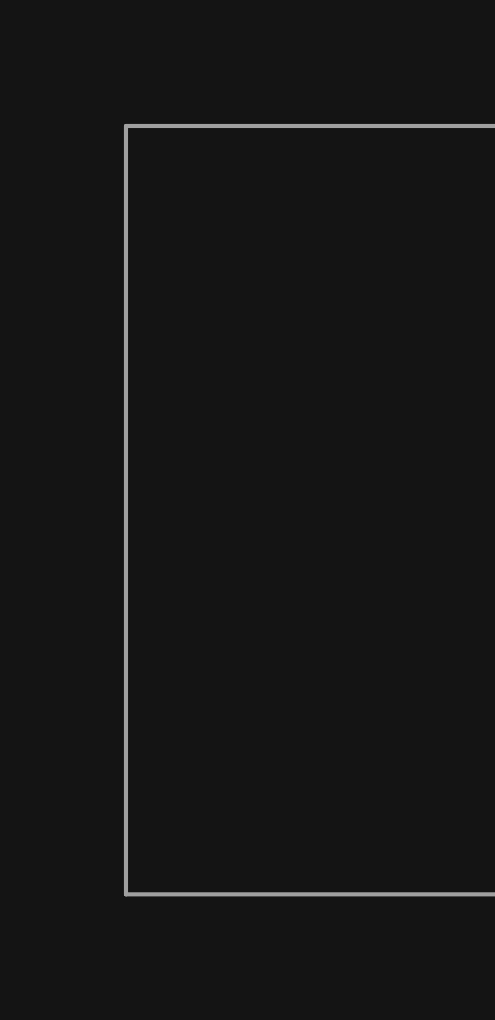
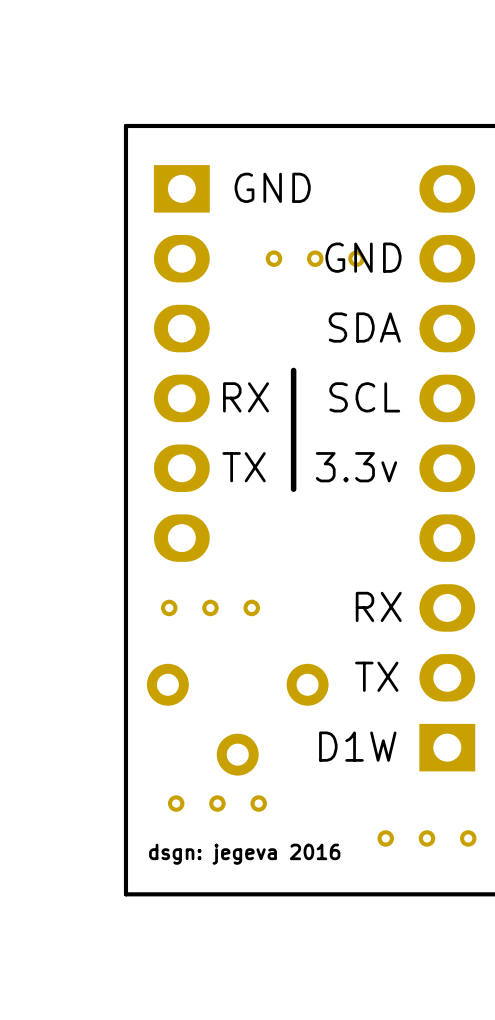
text: none -> GND (272, 187)
text: none -> GND (363, 257)
part: none -> (273, 258)
part: none -> (315, 258)
part: none -> (356, 258)
text: none -> SDA (364, 327)
part: none -> (181, 363)
line: none -> (293, 370) (293, 489)
text: none -> RX (246, 397)
text: none -> SCL (364, 397)
text: none -> TX (244, 467)
text: none -> 3.3v (356, 467)
part: none -> (447, 468)
text: none -> RX (378, 606)
part: none -> (169, 607)
part: none -> (210, 607)
part: none -> (251, 607)
text: none -> TX (376, 676)
part: none -> (237, 719)
text: none -> D1W (357, 746)
part: none -> (176, 803)
part: none -> (217, 803)
part: none -> (258, 803)
part: none -> (385, 838)
part: none -> (427, 838)
part: none -> (468, 838)
text: none -> dsgn: jegeva 2016 (244, 854)

